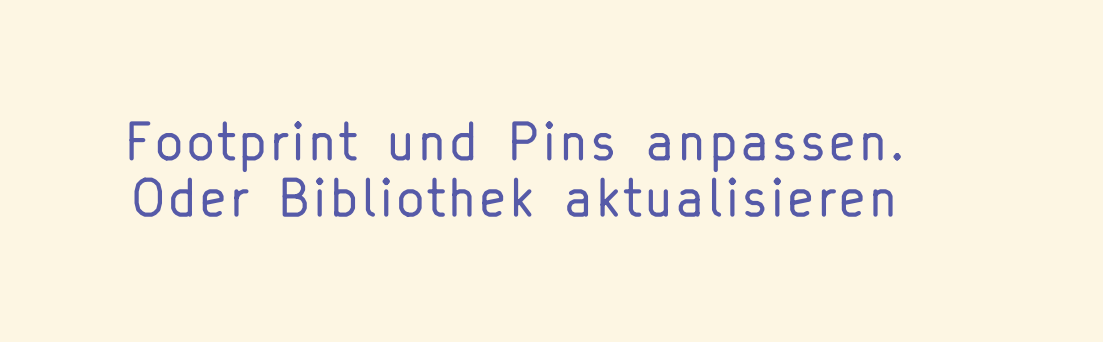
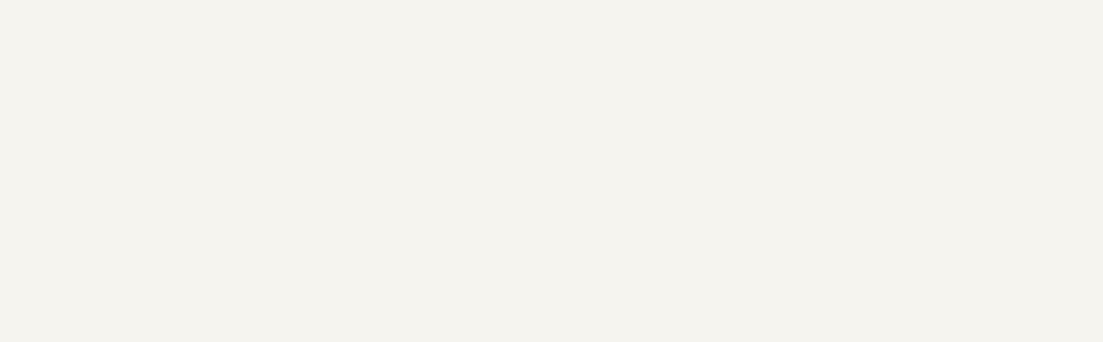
text: Footprint und Pins anpassen. (515, 146) -> none
text: Oder Bibliothek aktualisieren (513, 197) -> none

